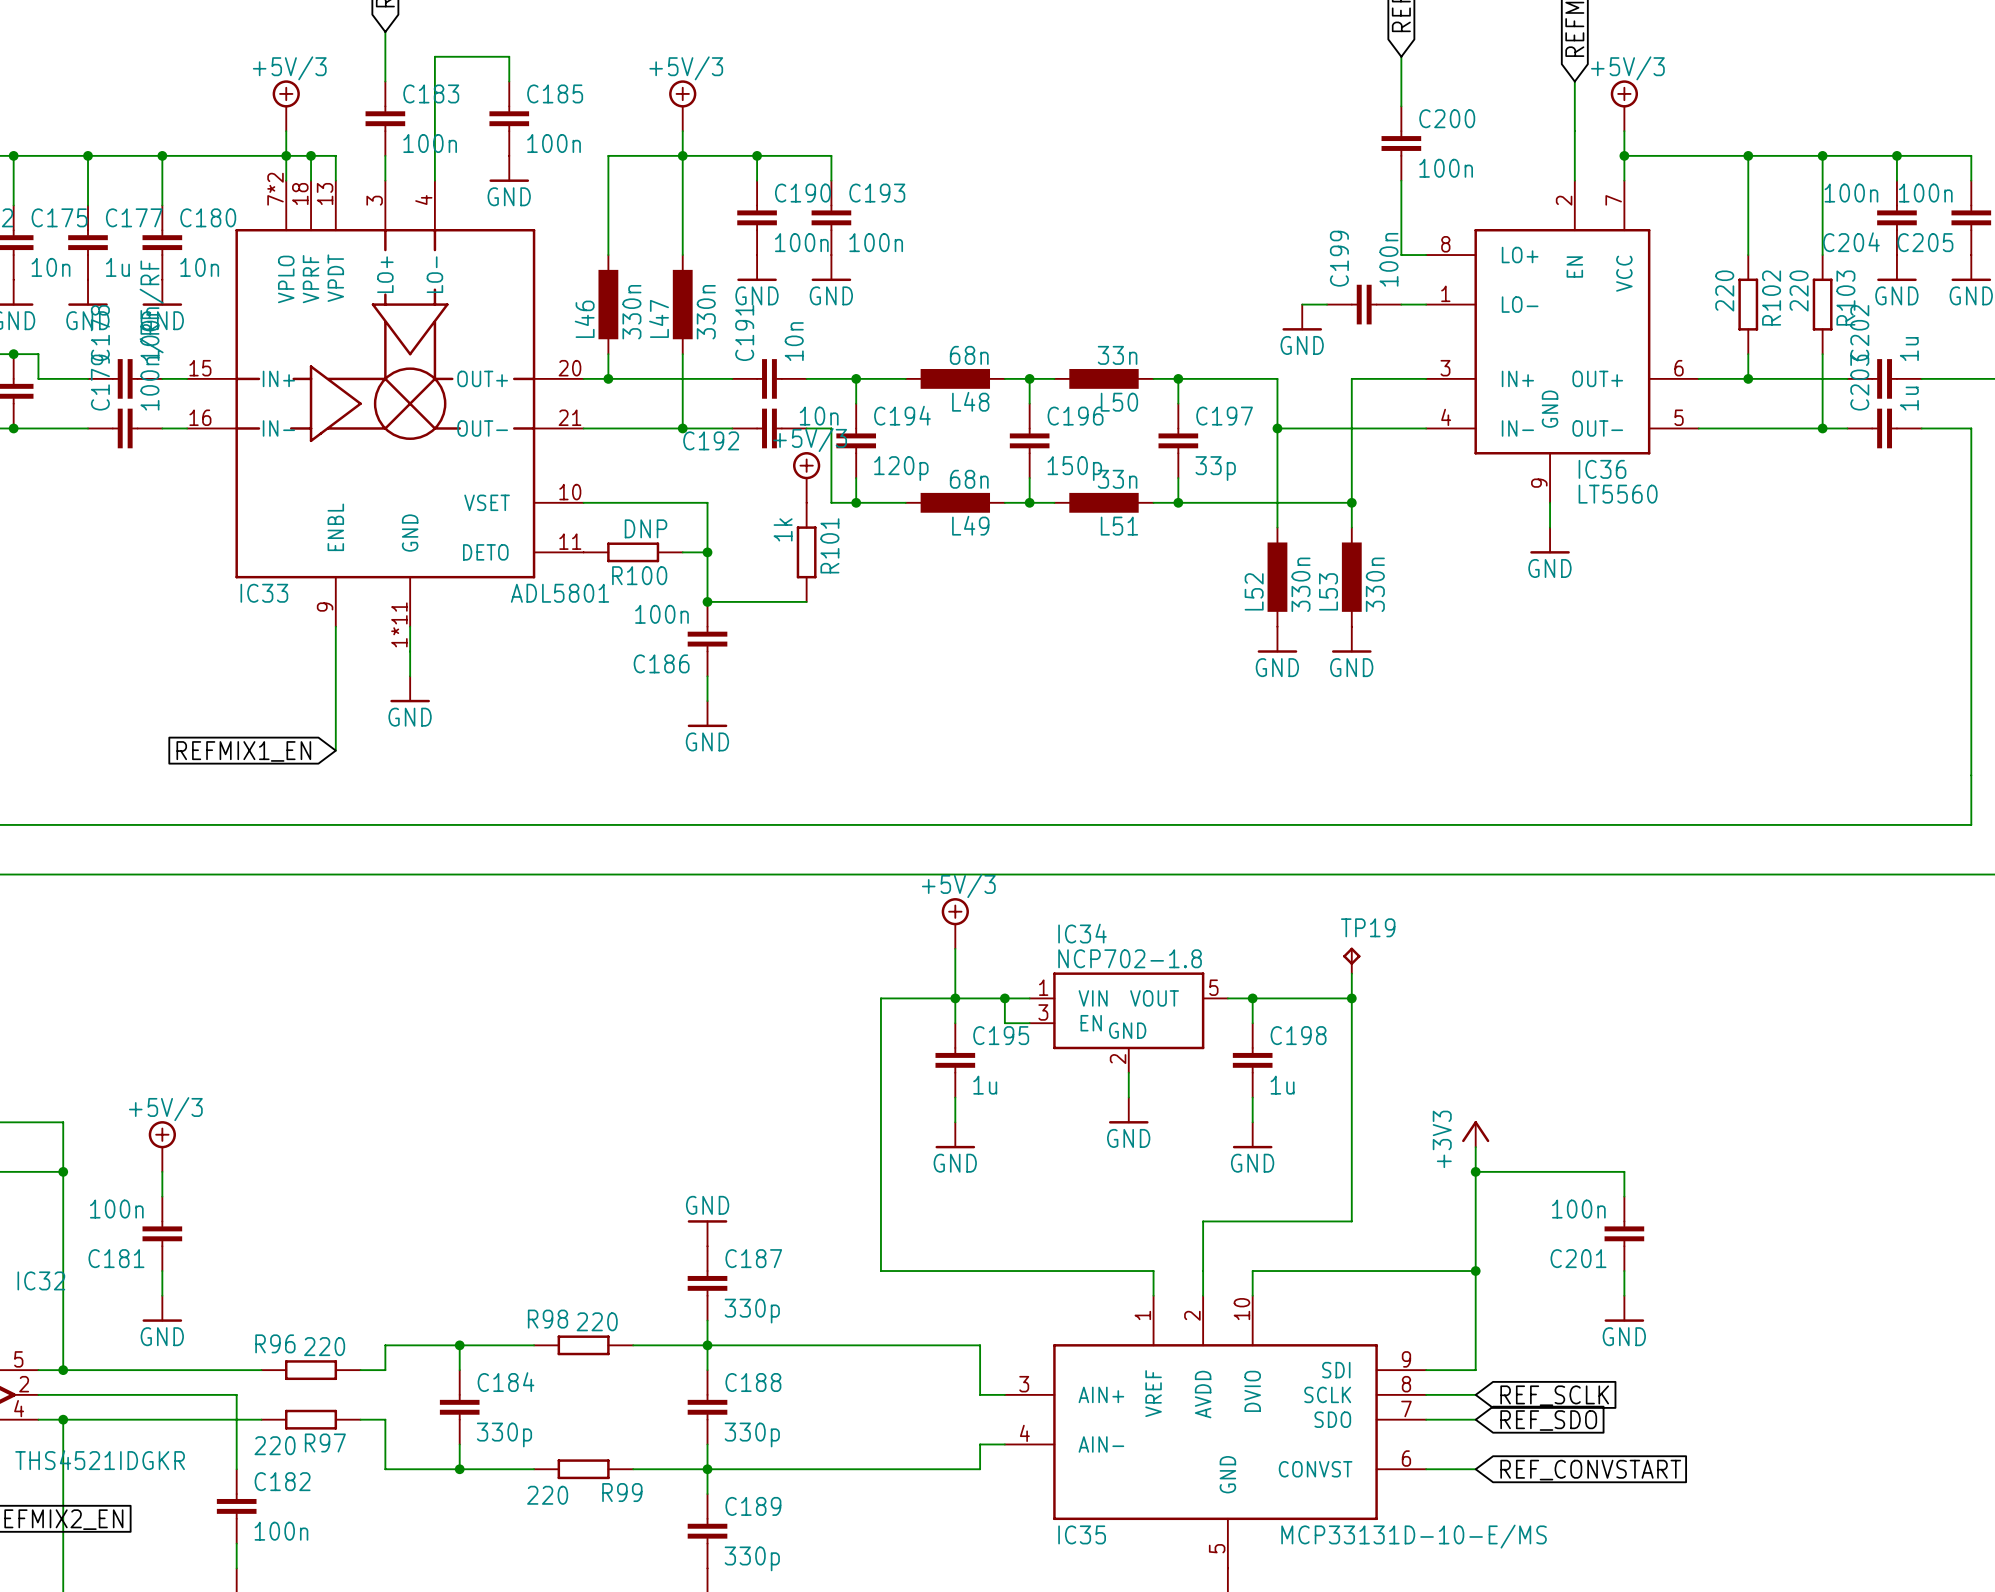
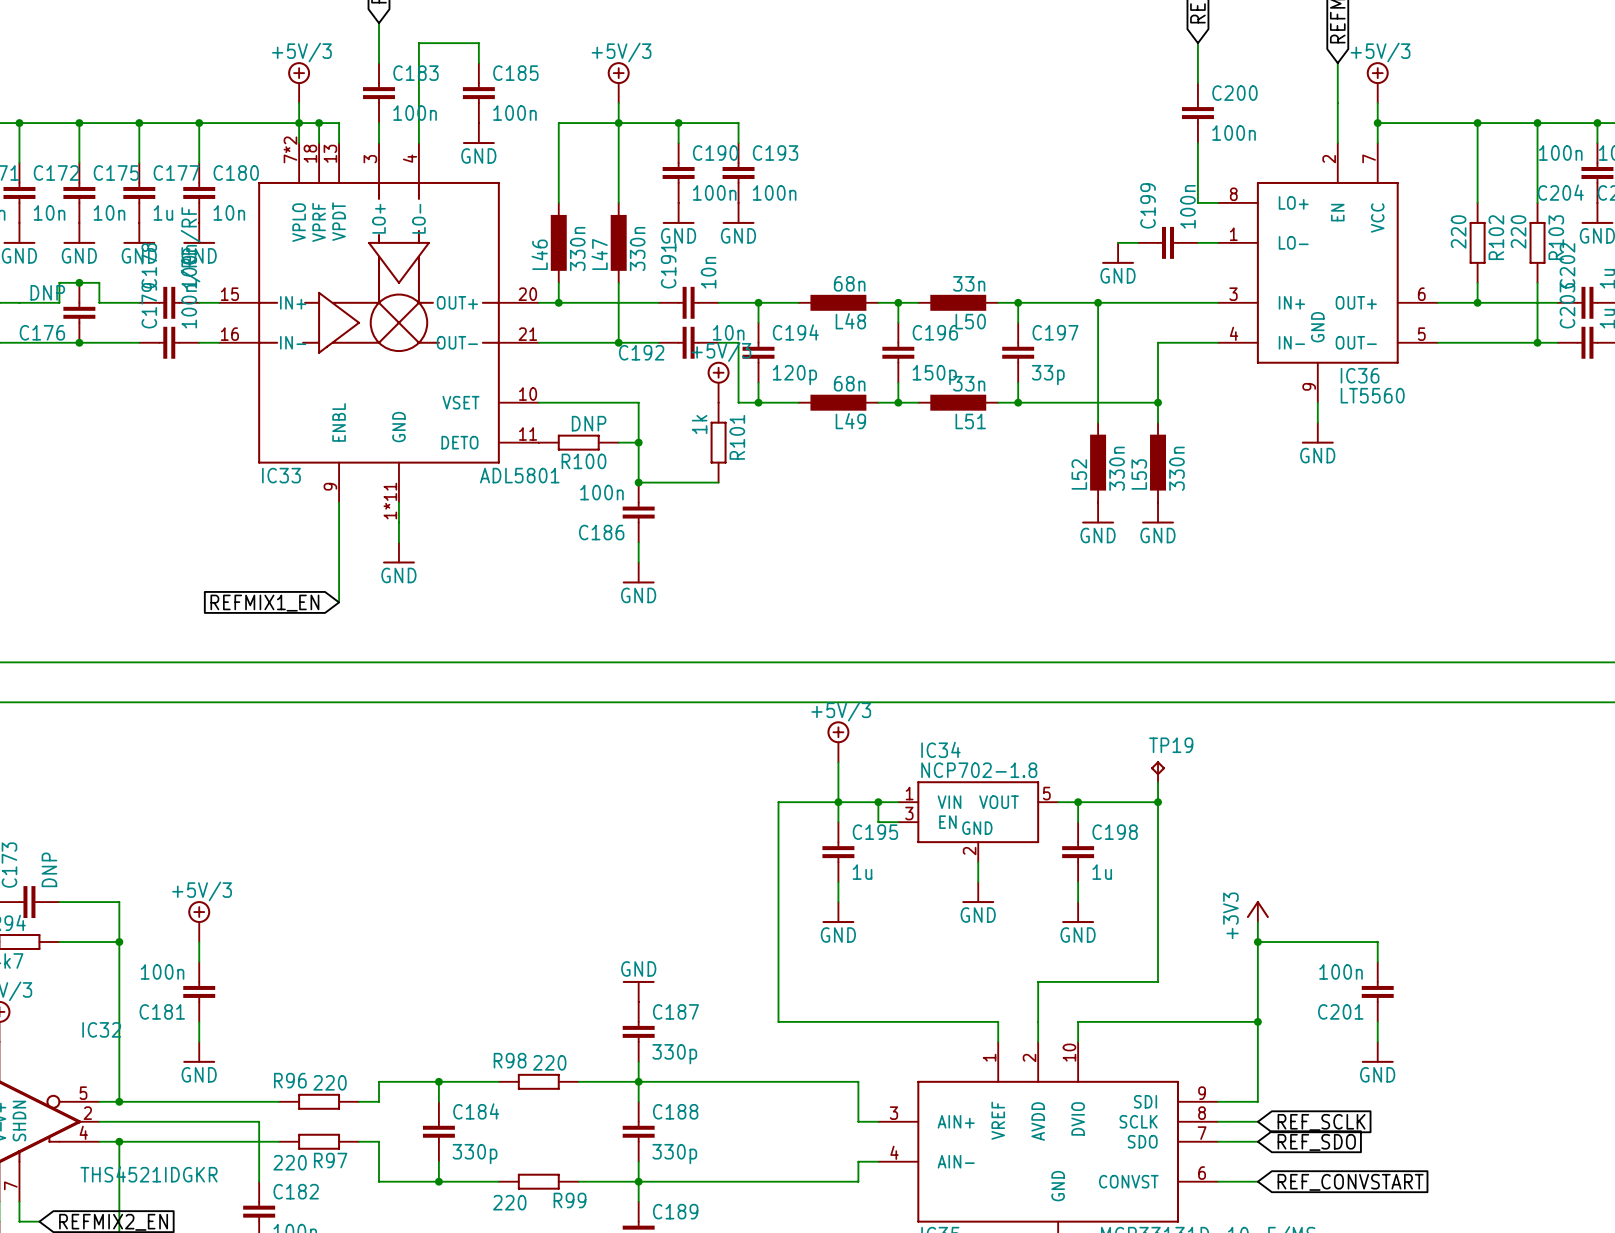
wire: (1351, 378) (1351, 428) (1277, 428) -> (1158, 302) (1098, 302)
junction position: (1277, 428) -> (1098, 302)

